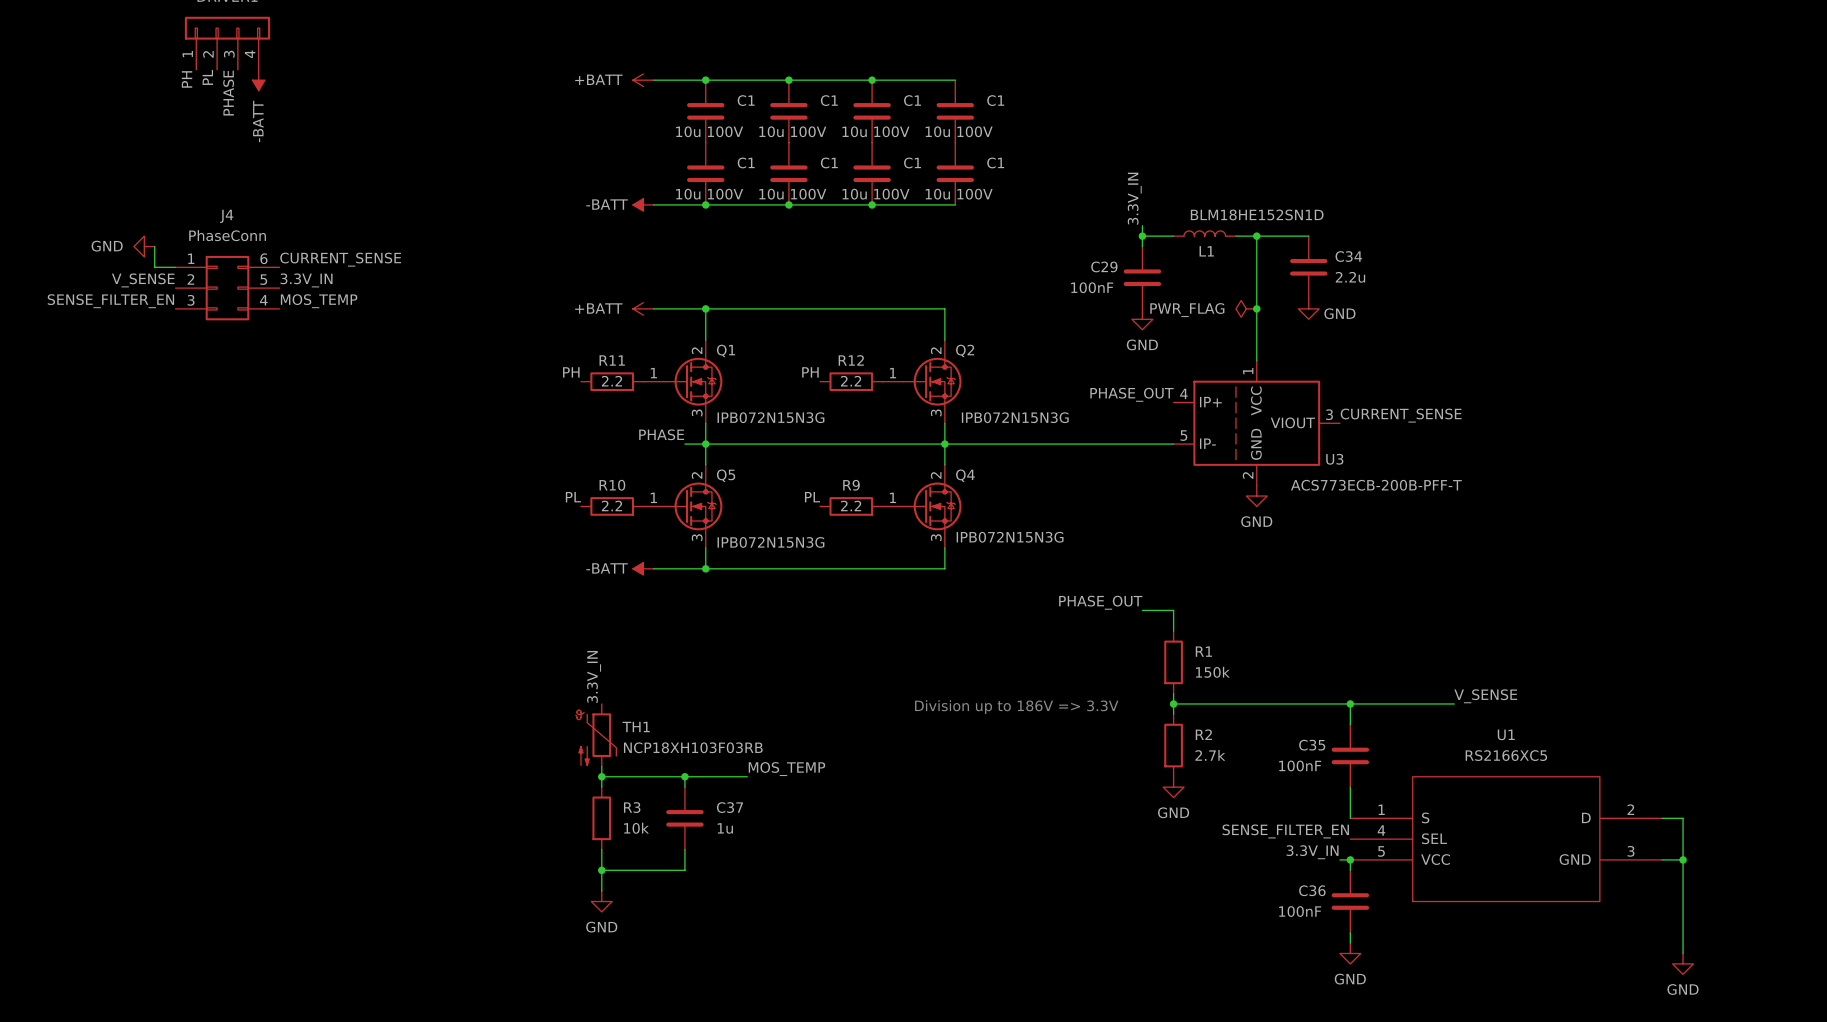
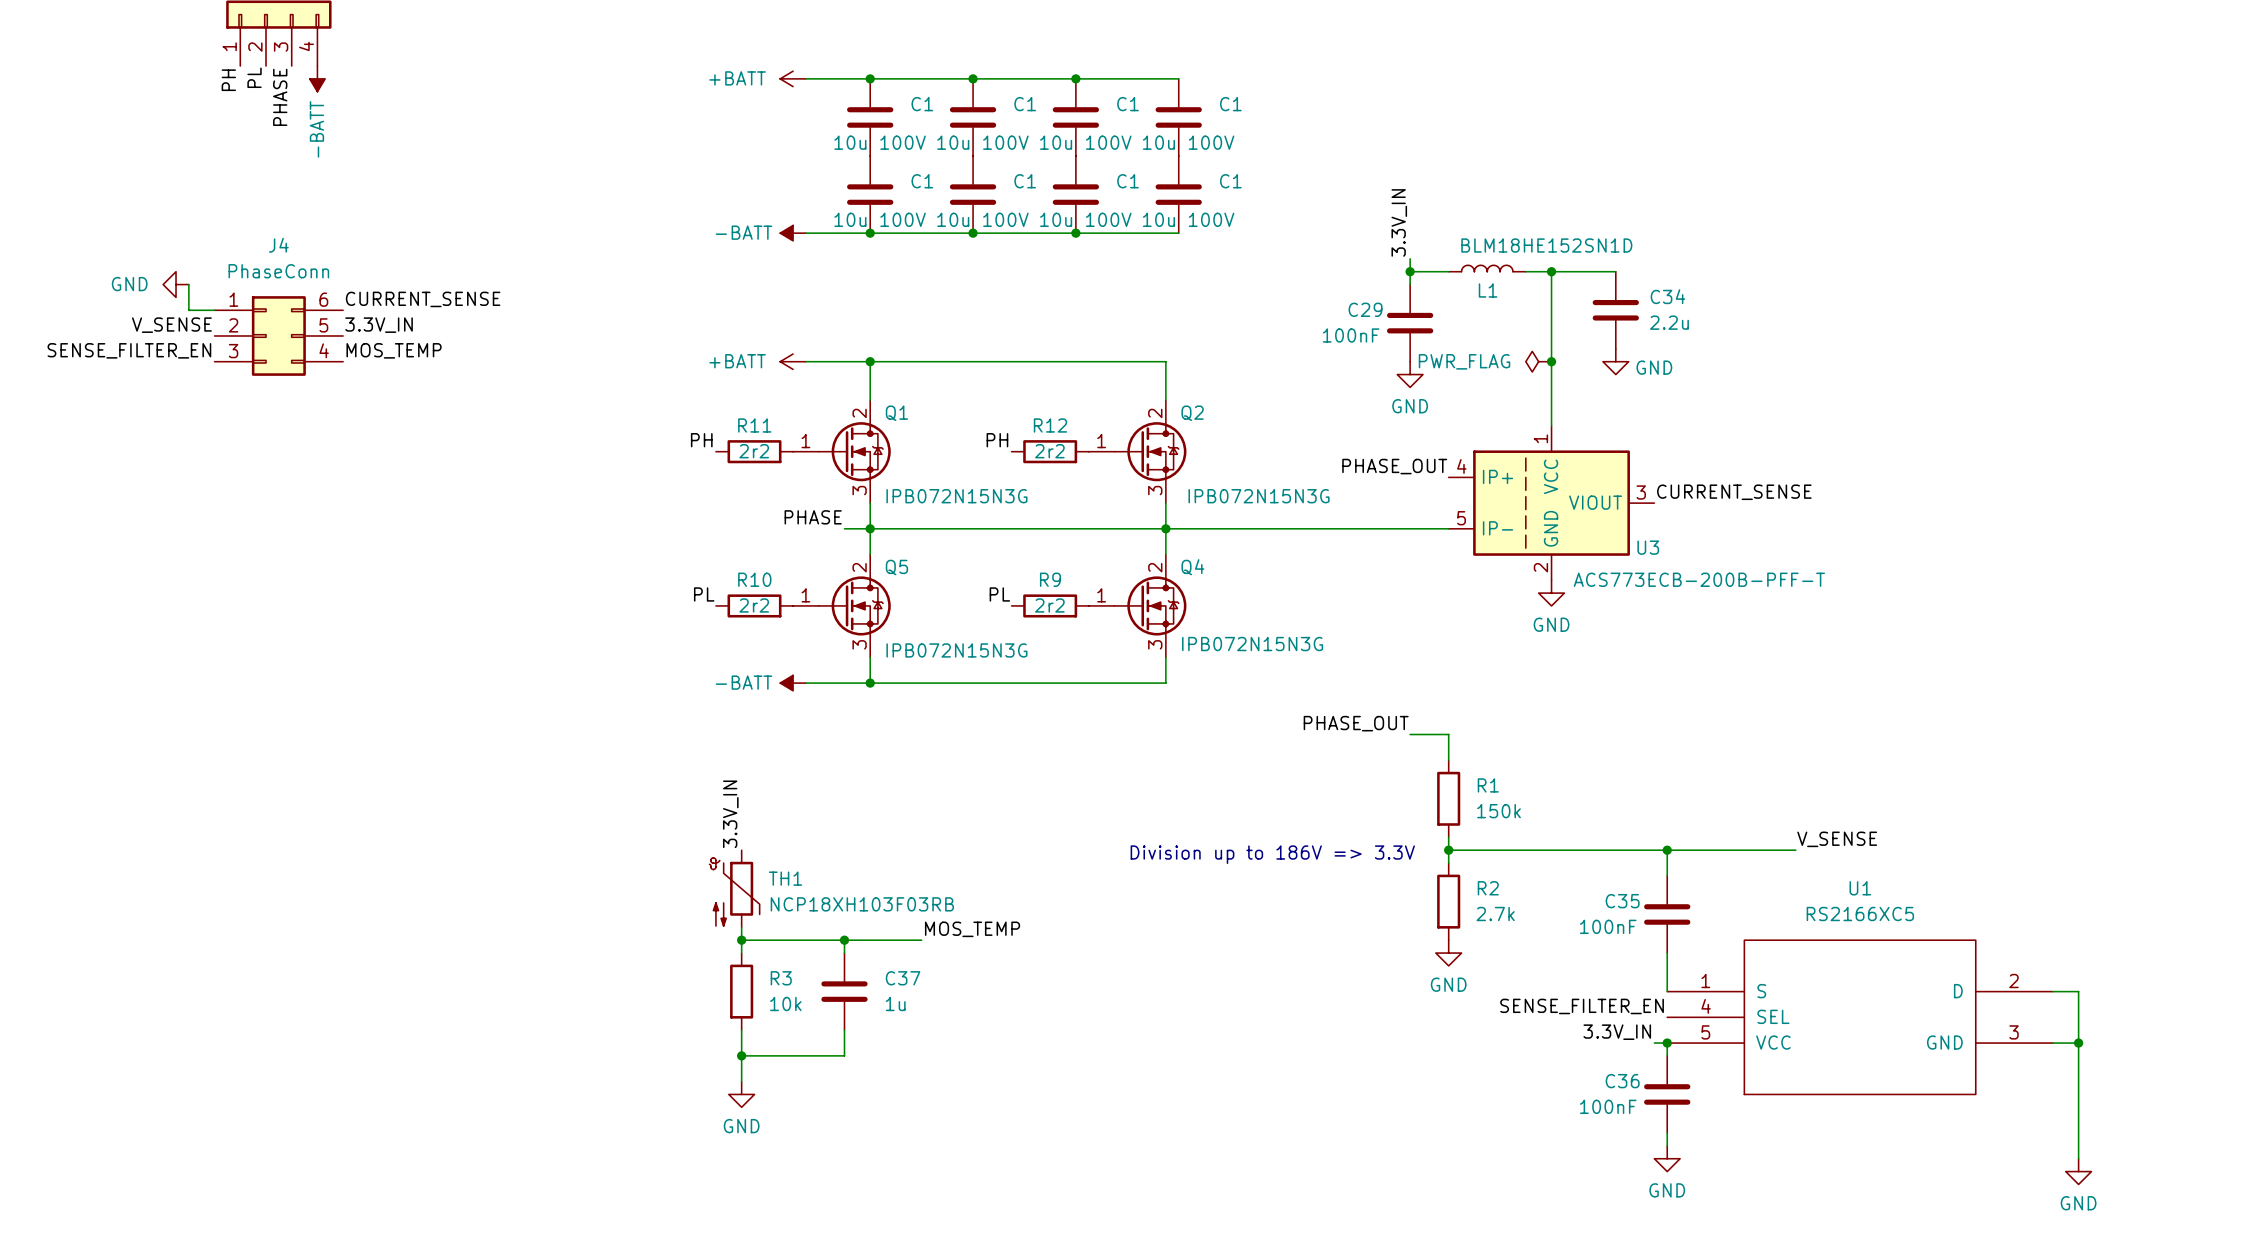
R11 value: 2.2 (611, 381) -> 2r2 (754, 451)
R12 value: 2.2 (851, 381) -> 2r2 (1049, 451)
R10 value: 2.2 (611, 505) -> 2r2 (754, 605)
R9 value: 2.2 (851, 505) -> 2r2 (1049, 605)

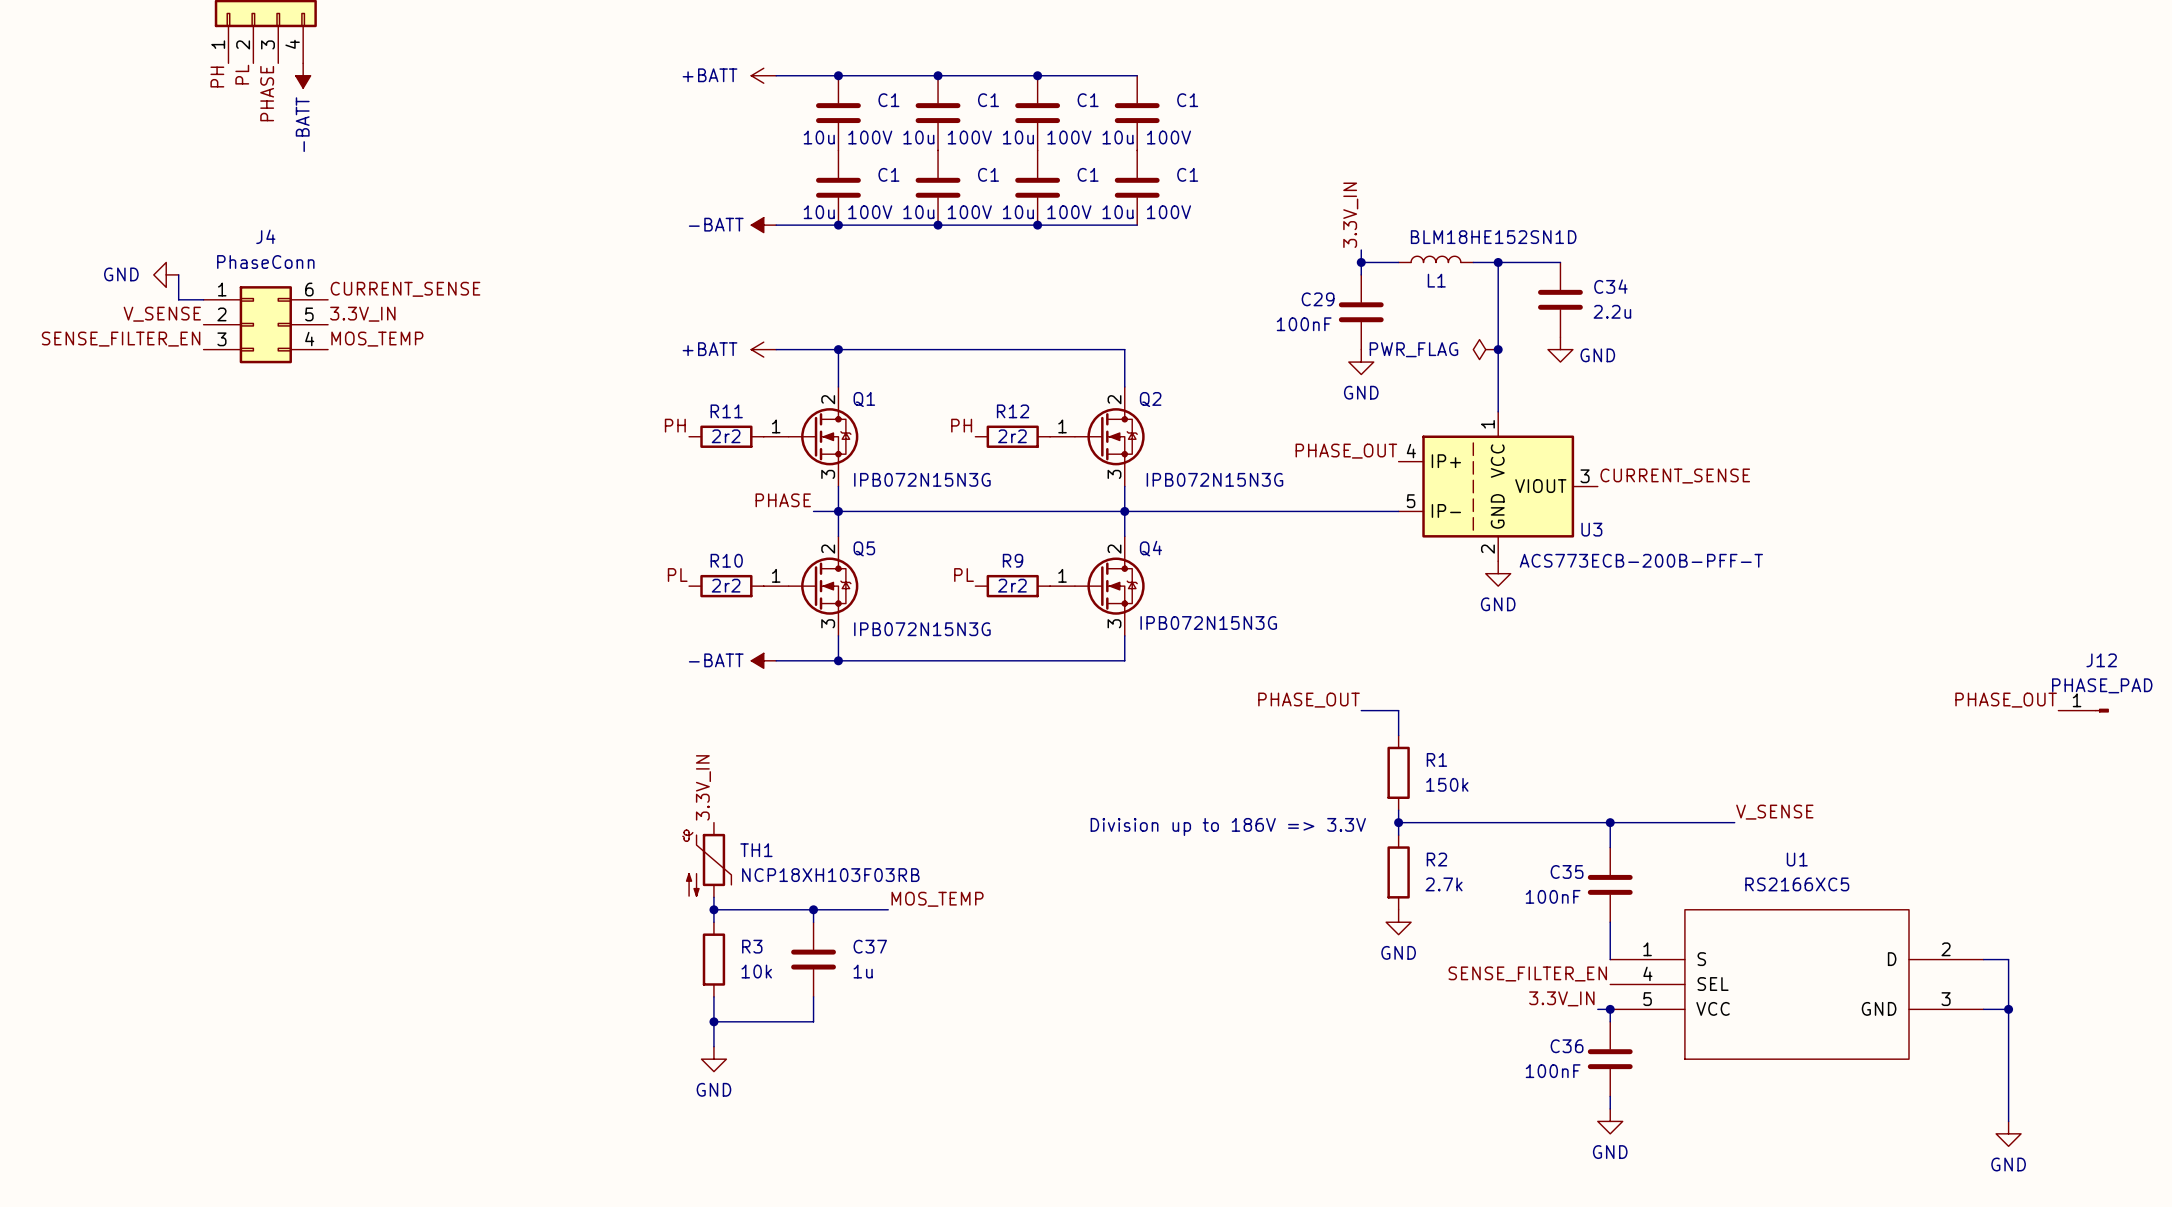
label: none -> PHASE_OUT (2006, 700)
J12: none -> PHASE_PAD (2083, 710)

